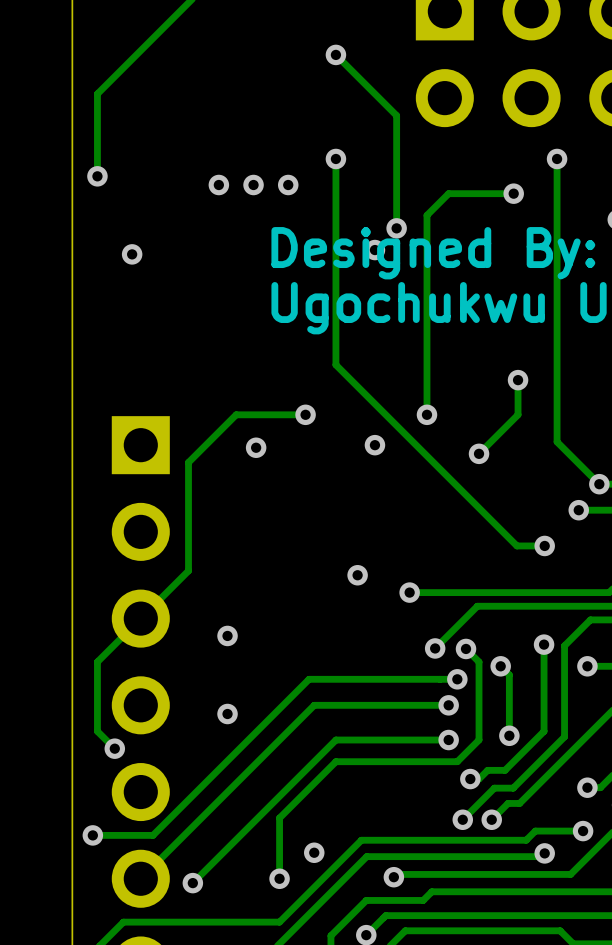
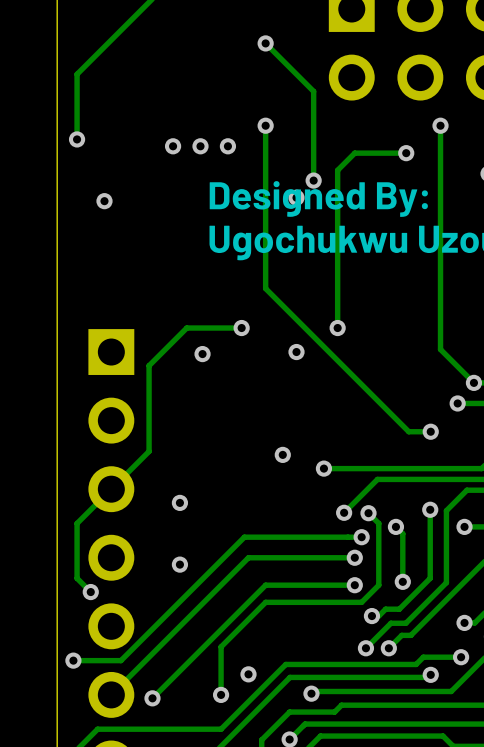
track: (518, 380) (518, 414) (479, 453) -> none
via: (518, 380) -> none
via: (479, 453) -> none

